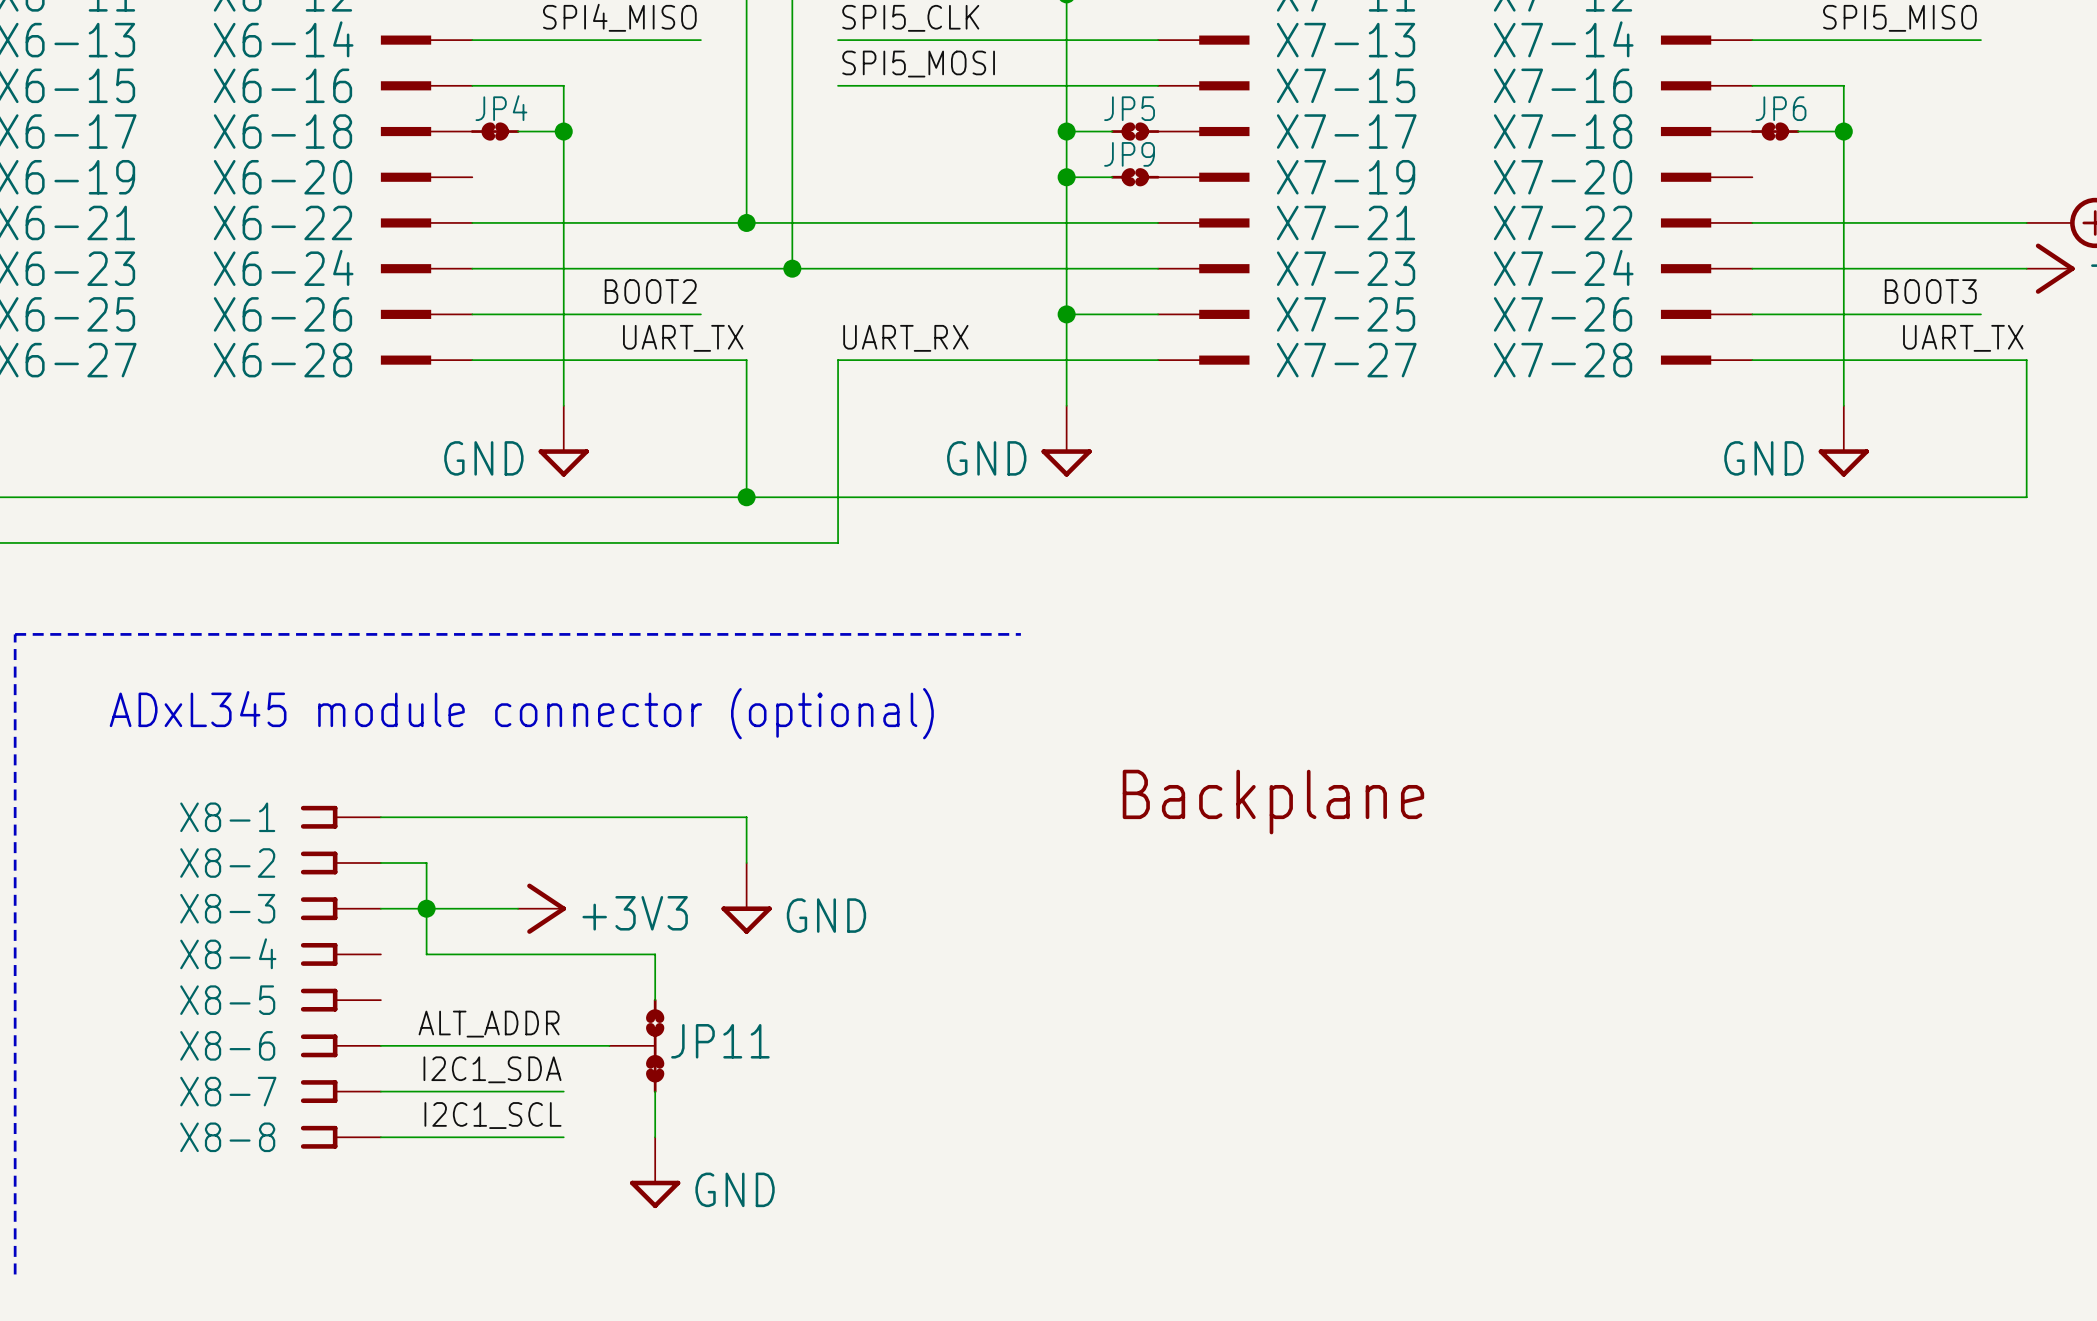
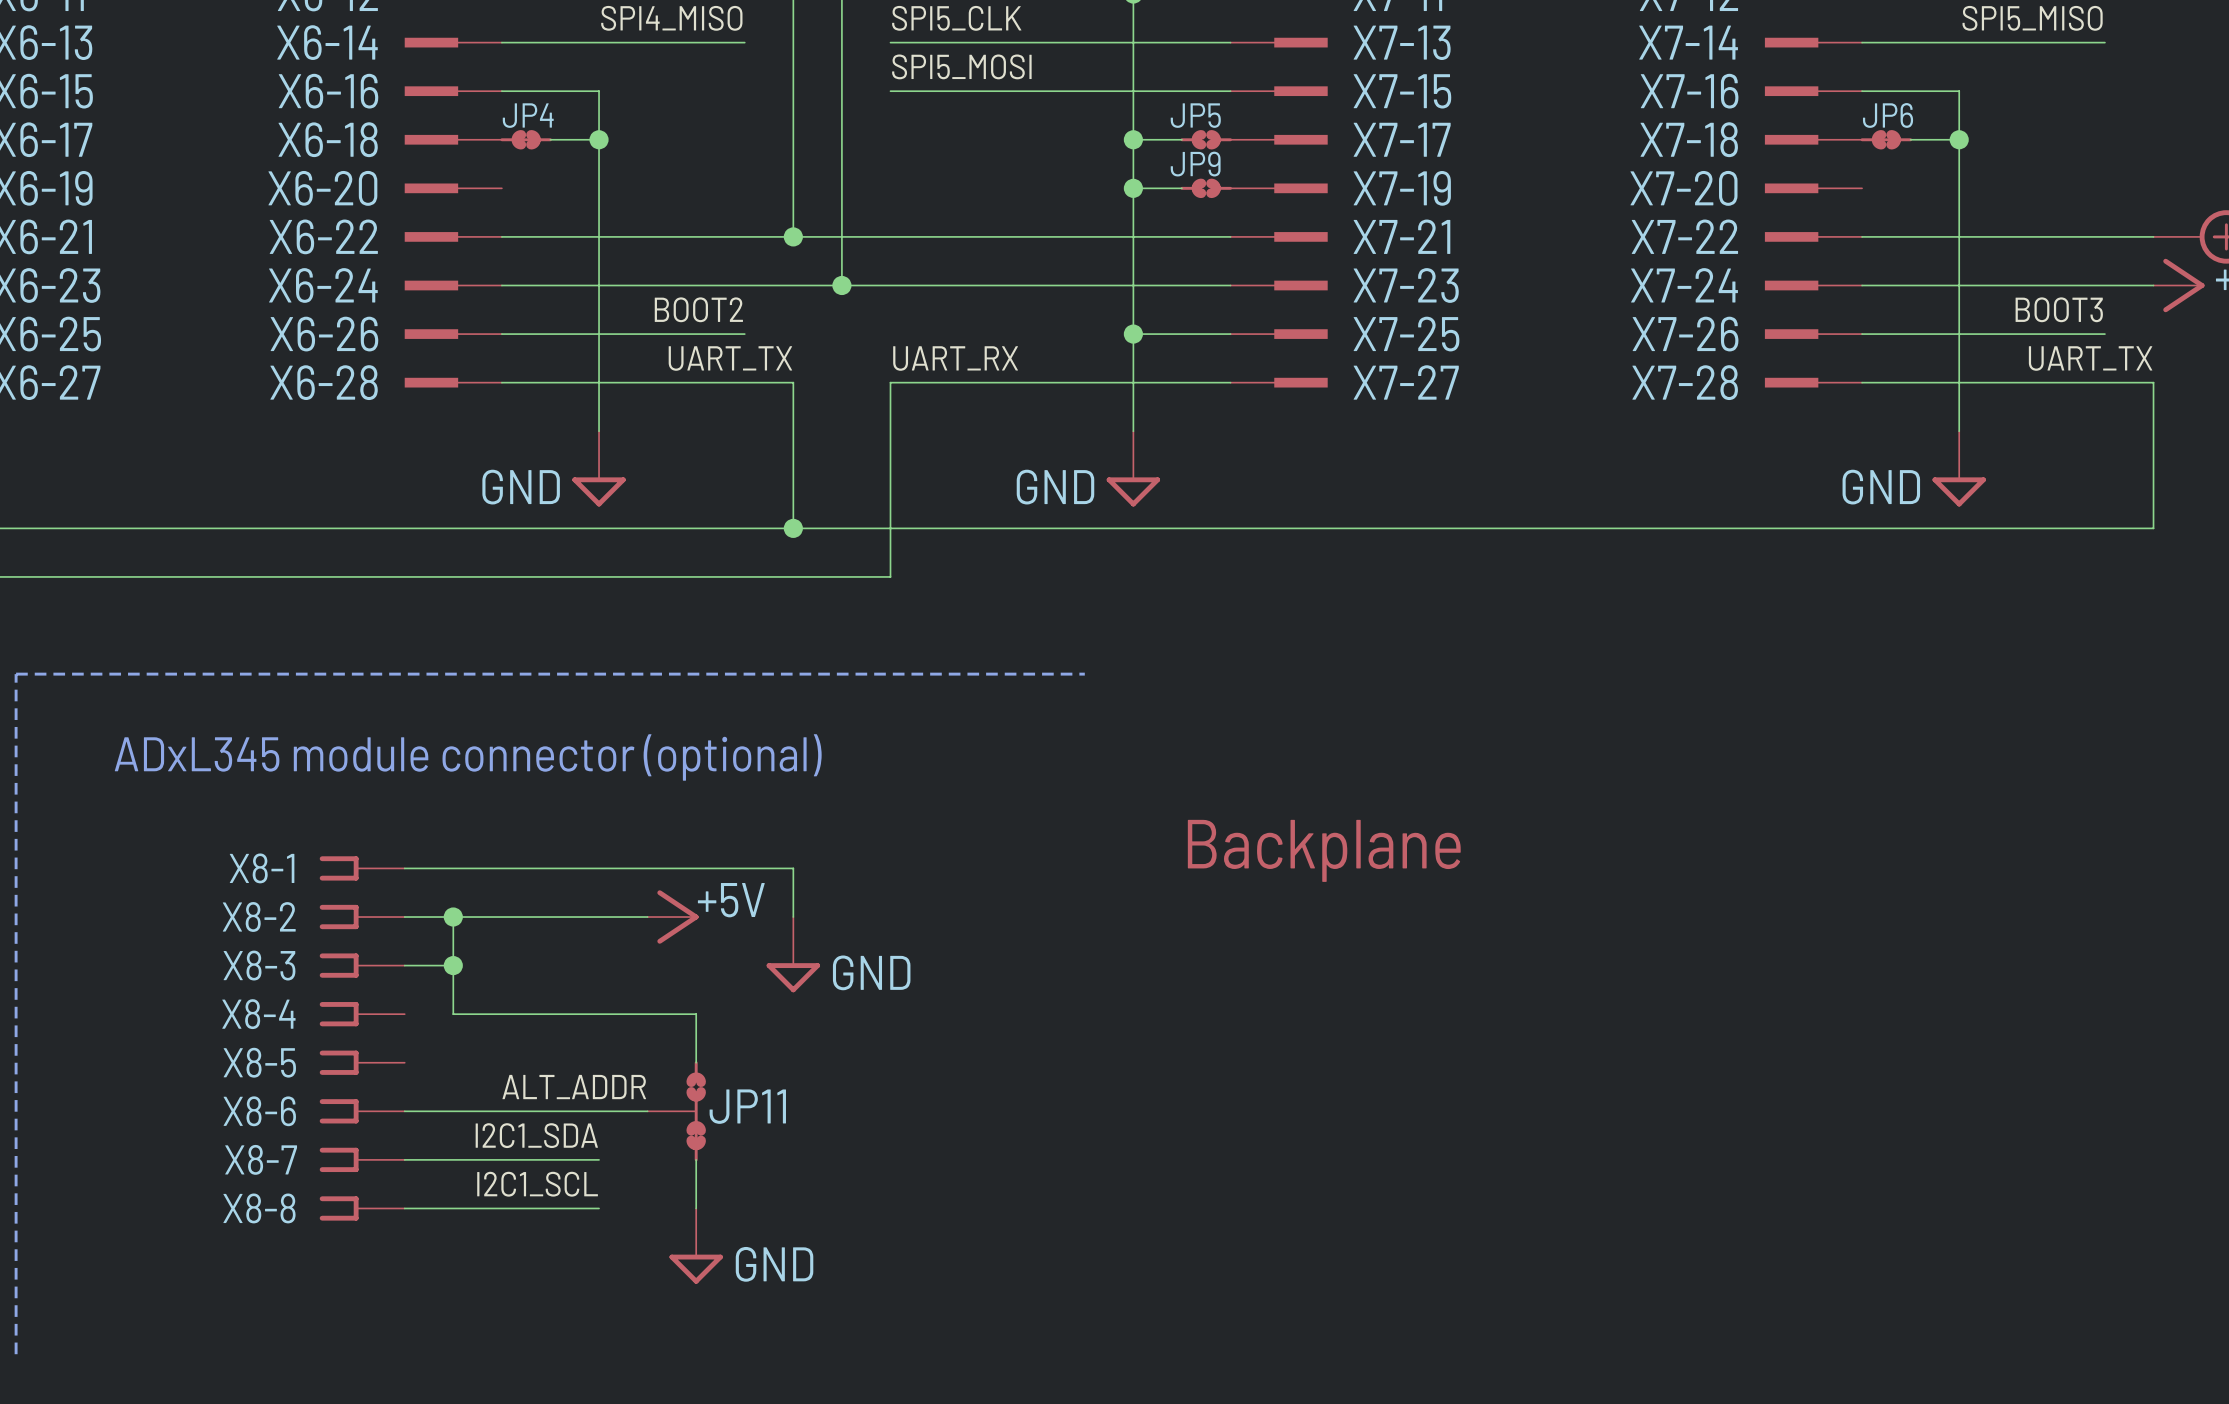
wire: none -> (453, 917) (647, 917)
junction: none -> (453, 917)
power symbol: none -> +5V (673, 917)
wire: (426, 908) (518, 908) -> none
power symbol: +3V3 (542, 908) -> none
label position: ALT_ADDR (489, 1024) -> ALT_ADDR (574, 1087)

